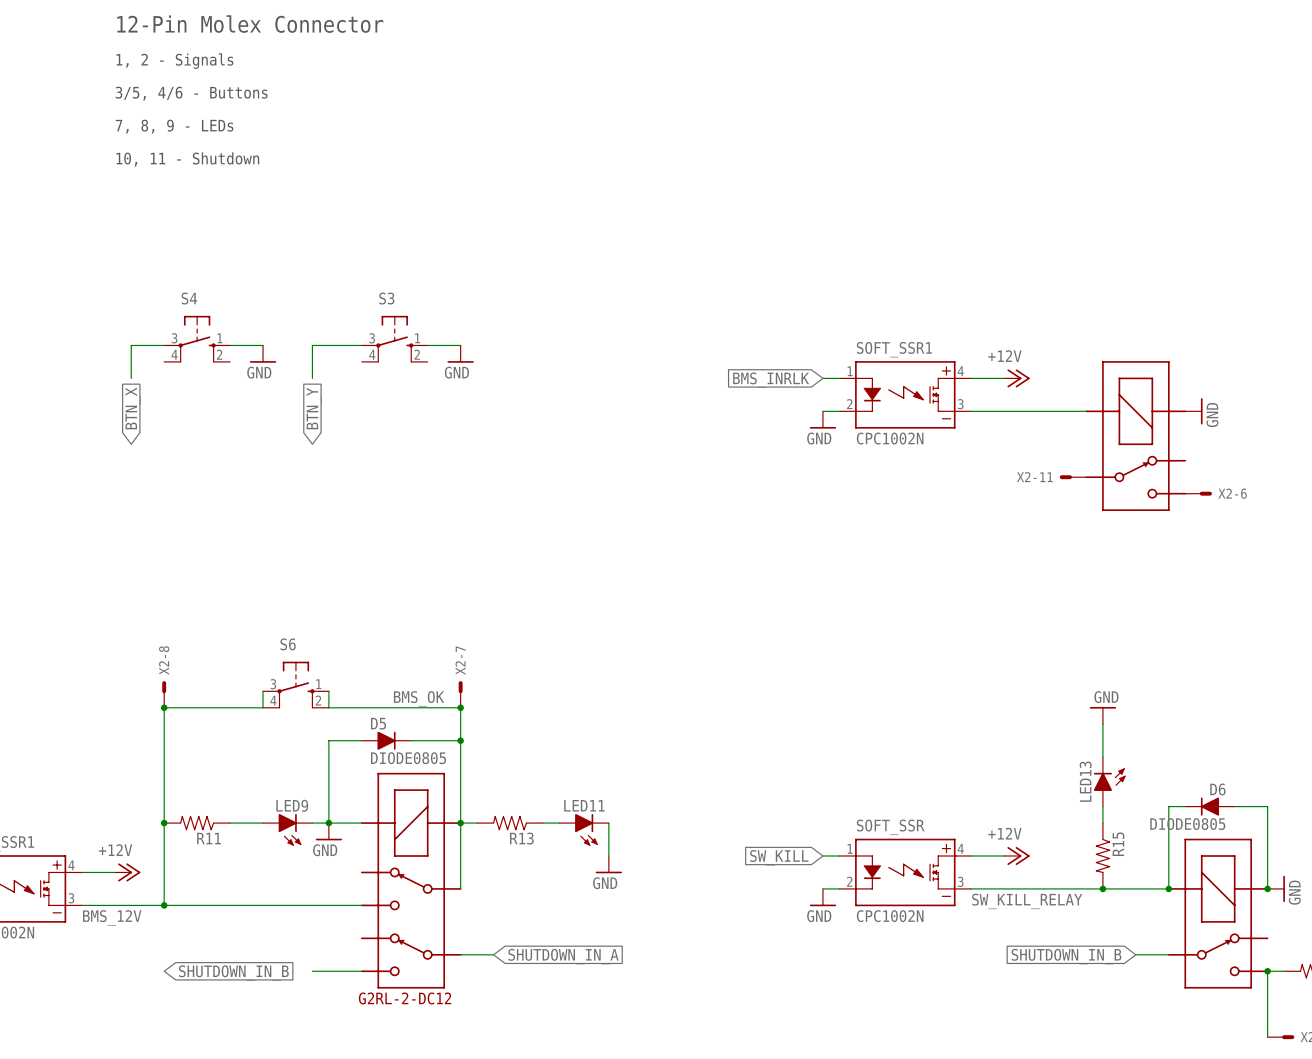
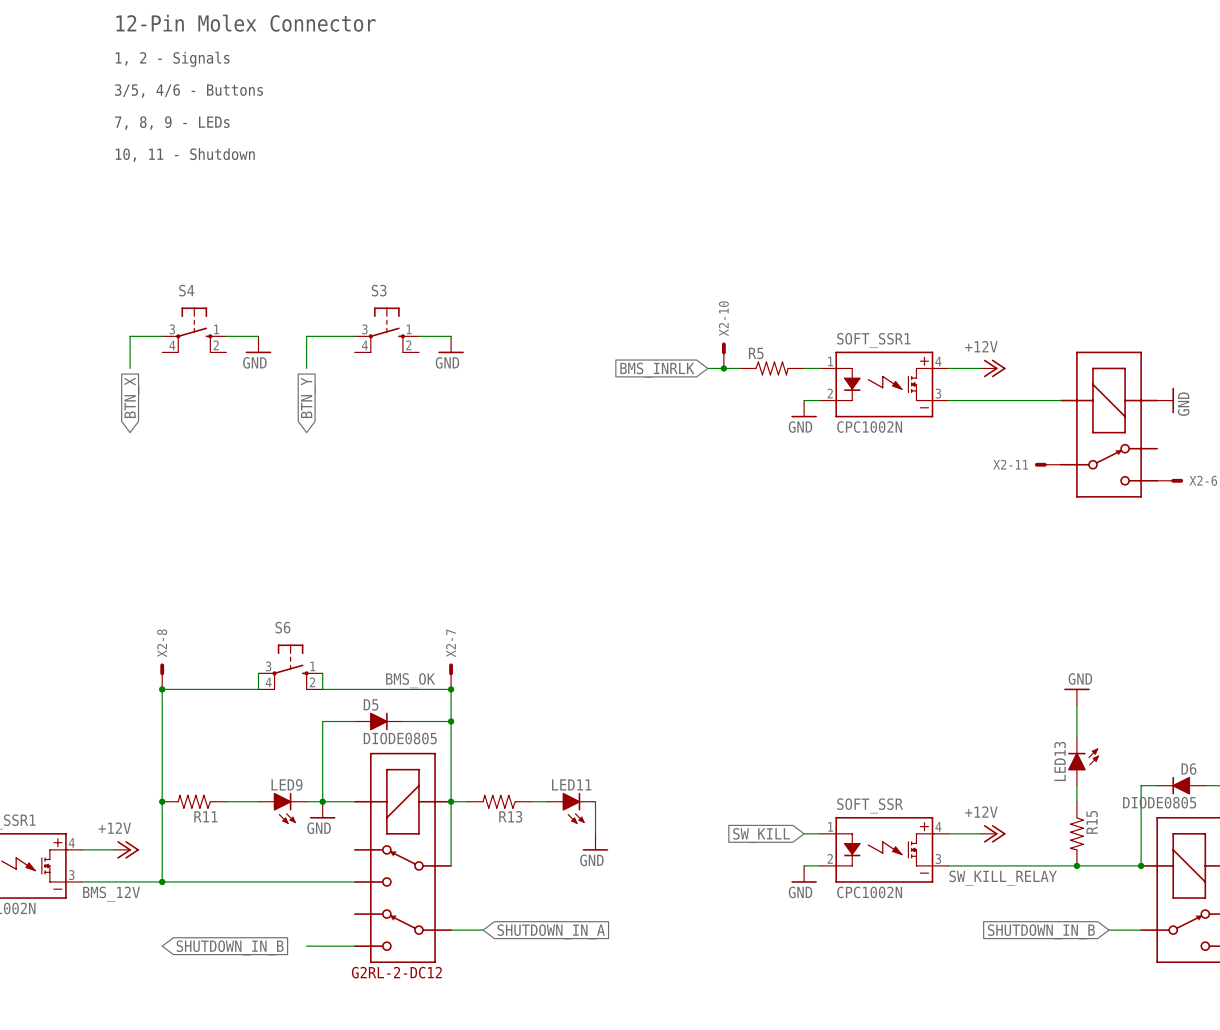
X2-10: none -> (723, 355)
wire: none -> (707, 368) (739, 368)
junction: none -> (723, 368)
R5: none -> (772, 368)
global label position: BMS_INRLK (771, 380) -> BMS_INRLK (657, 370)

